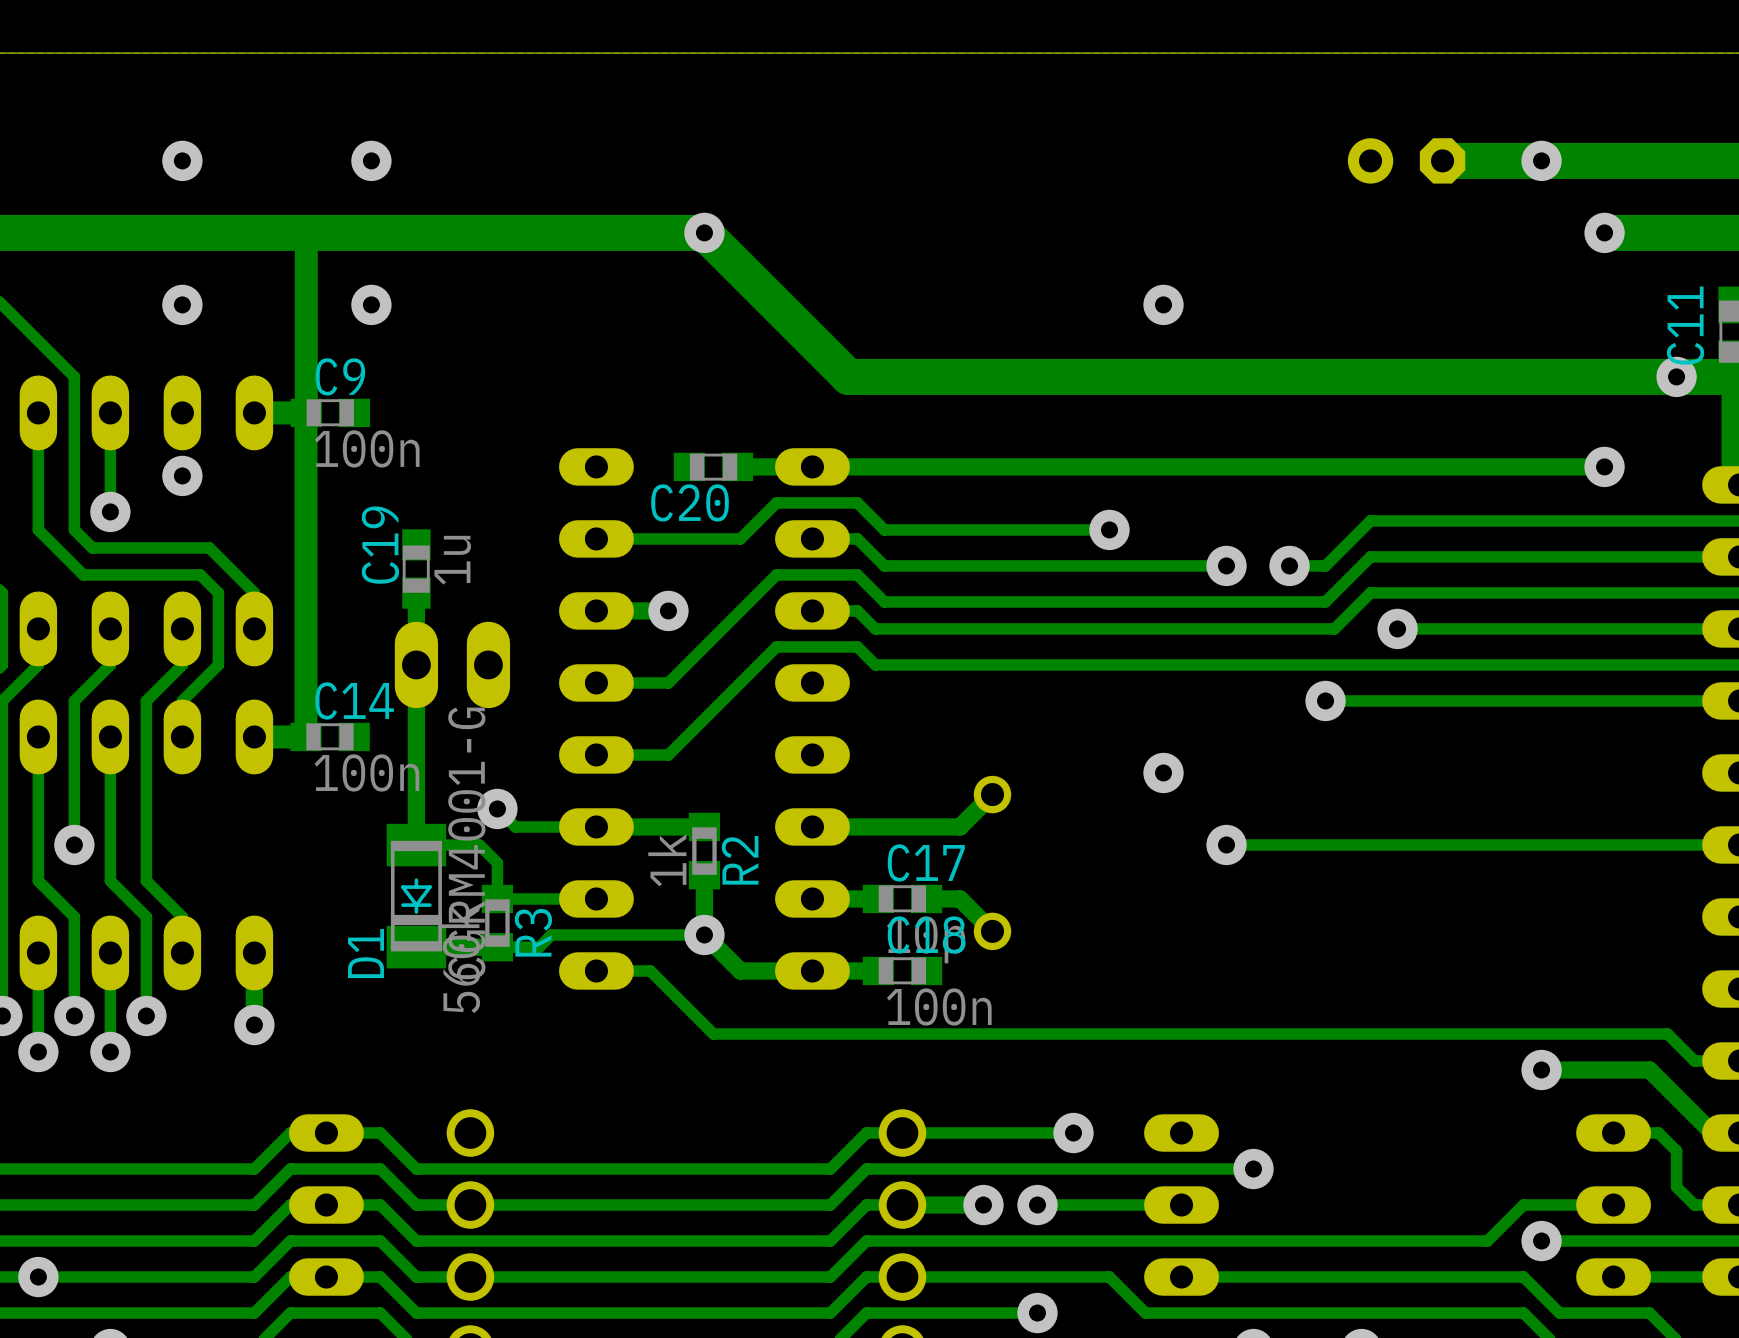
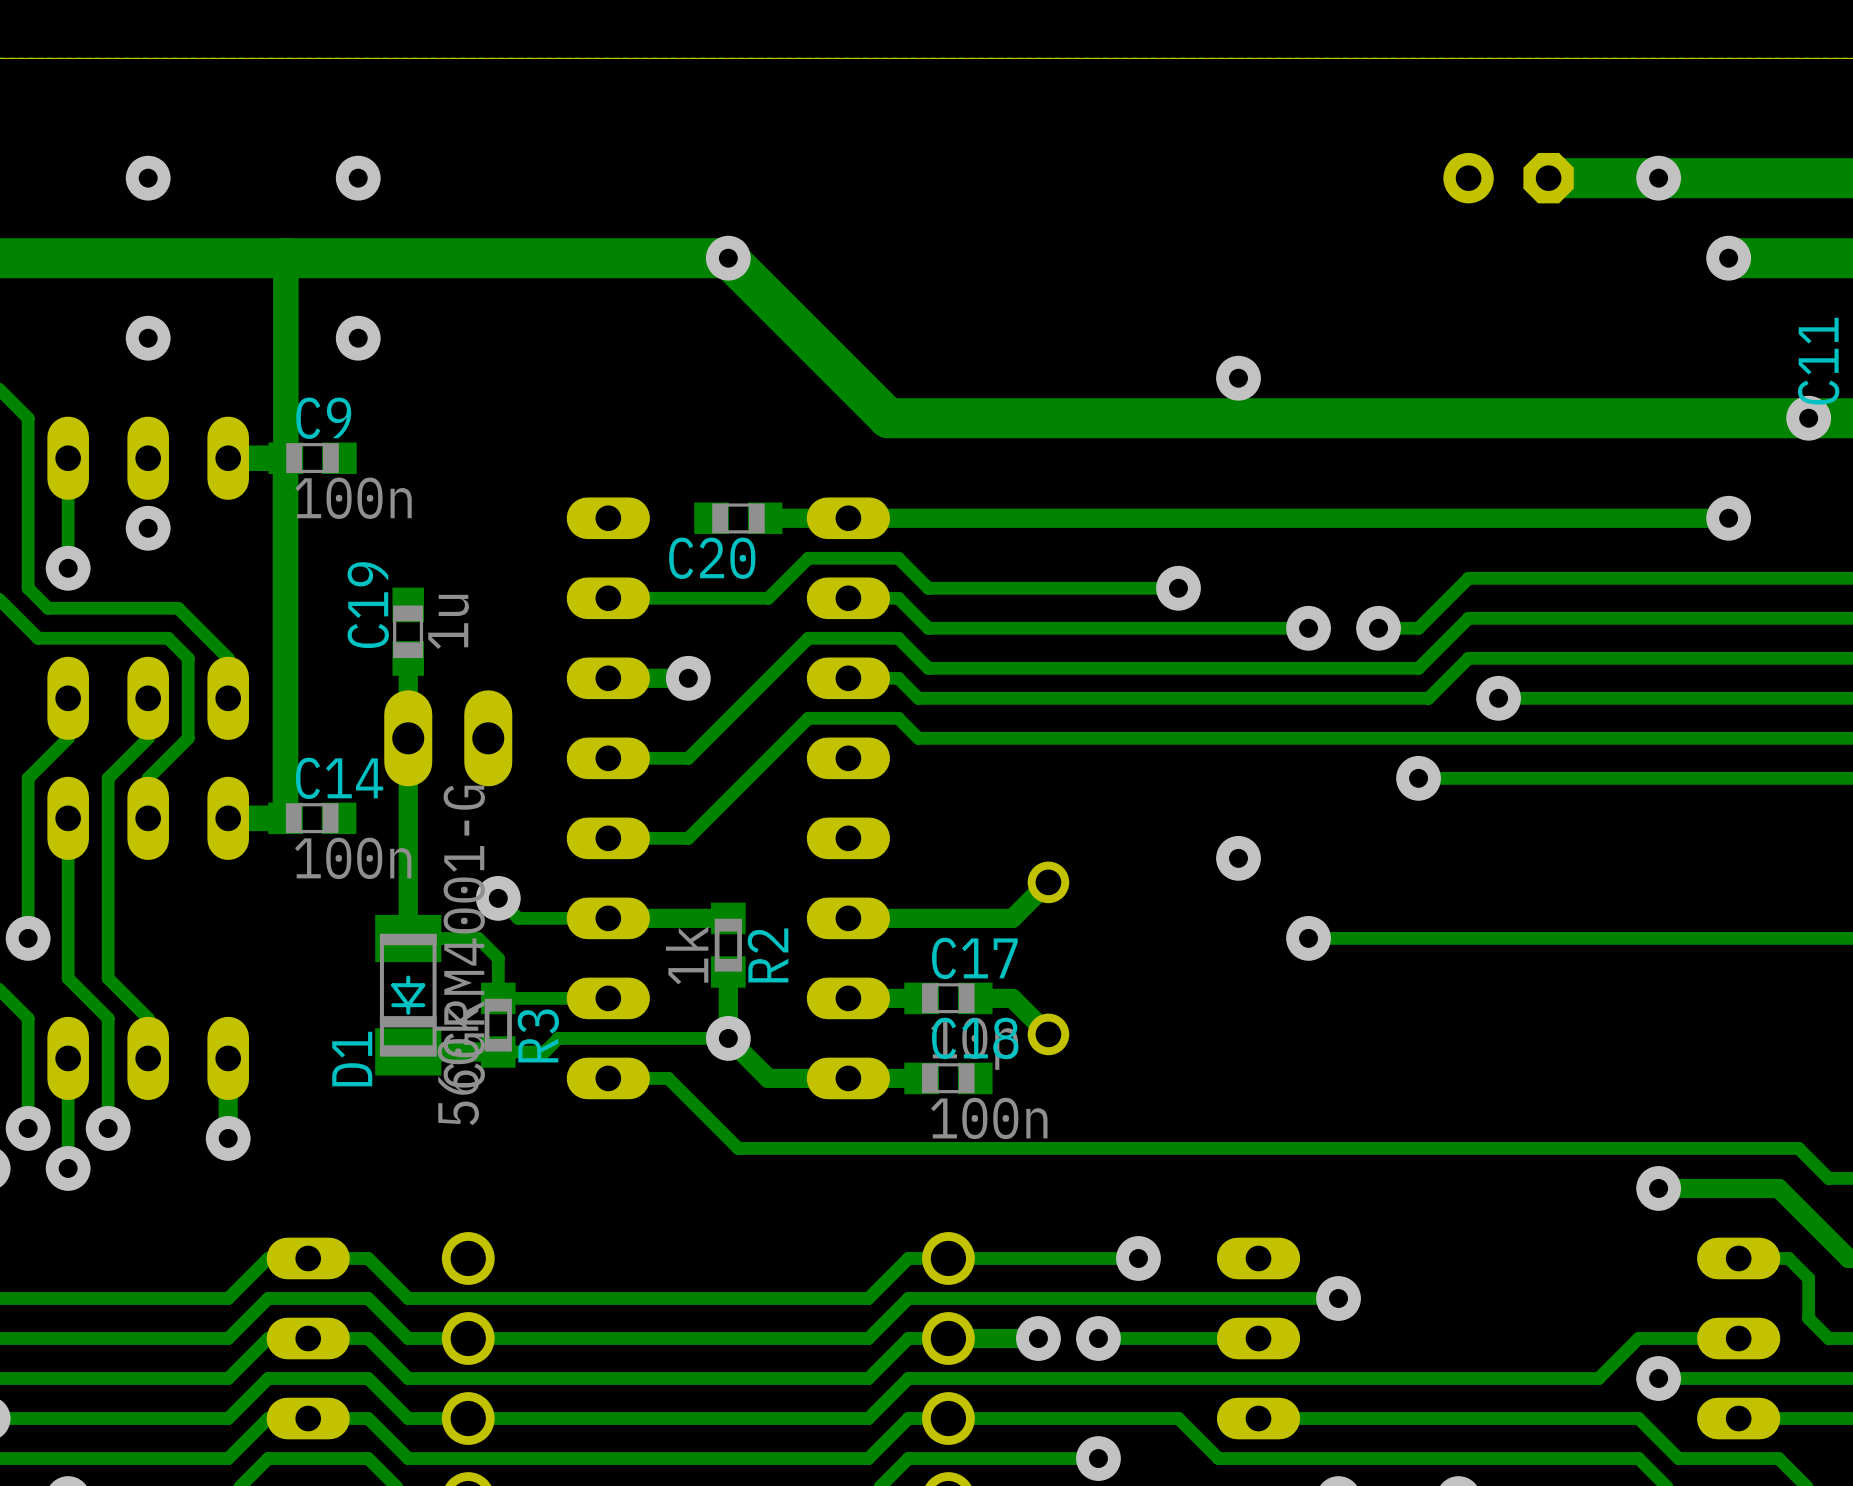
via position: (1163, 304) -> (1238, 378)

